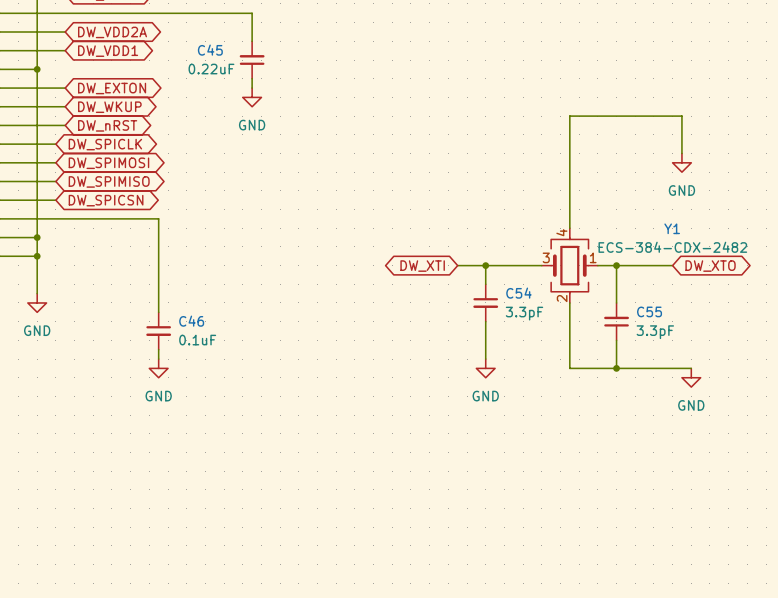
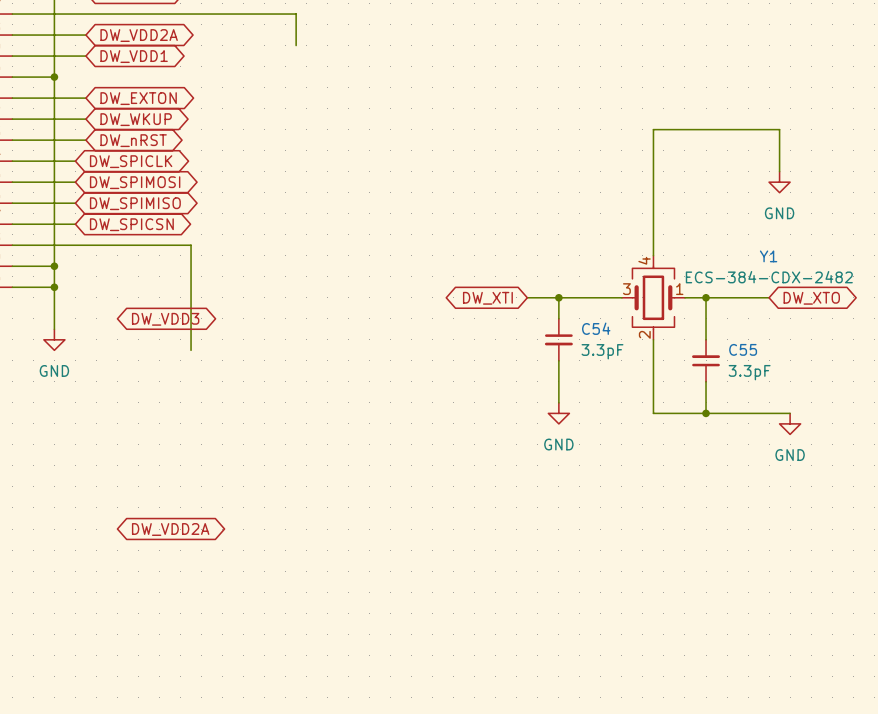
C45: 0.22uF (252, 60) -> none
wire: (252, 78) (252, 88) -> none
power symbol: GND (252, 97) -> none
global label: none -> DW_VDD3 (165, 319)
C46: 0.1uF (158, 331) -> none
wire: (158, 349) (158, 359) -> none
power symbol: GND (158, 368) -> none
global label: none -> DW_VDD2A (170, 529)

